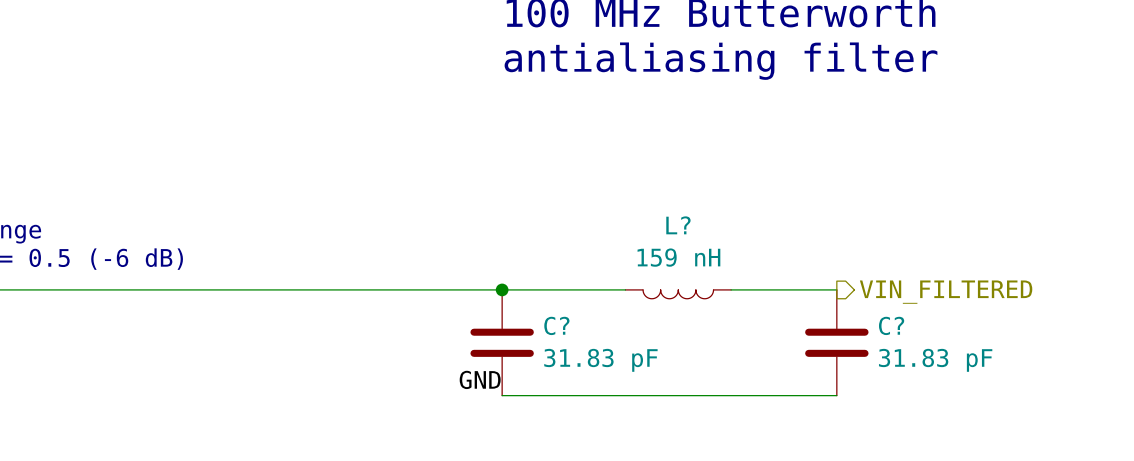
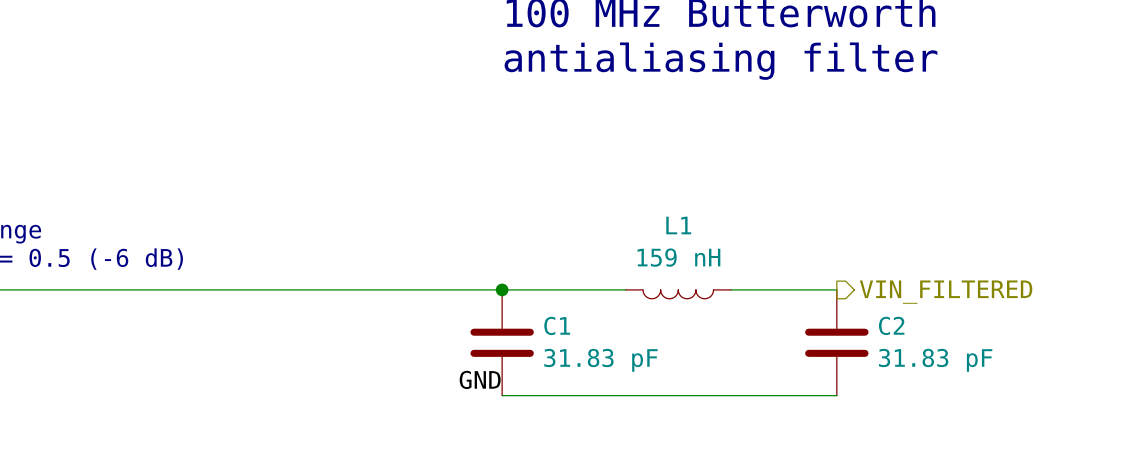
L? name: L? (678, 225) -> L1 (678, 225)
C? name: C? (556, 325) -> C1 (557, 325)
C? name: C? (891, 325) -> C2 (891, 325)

